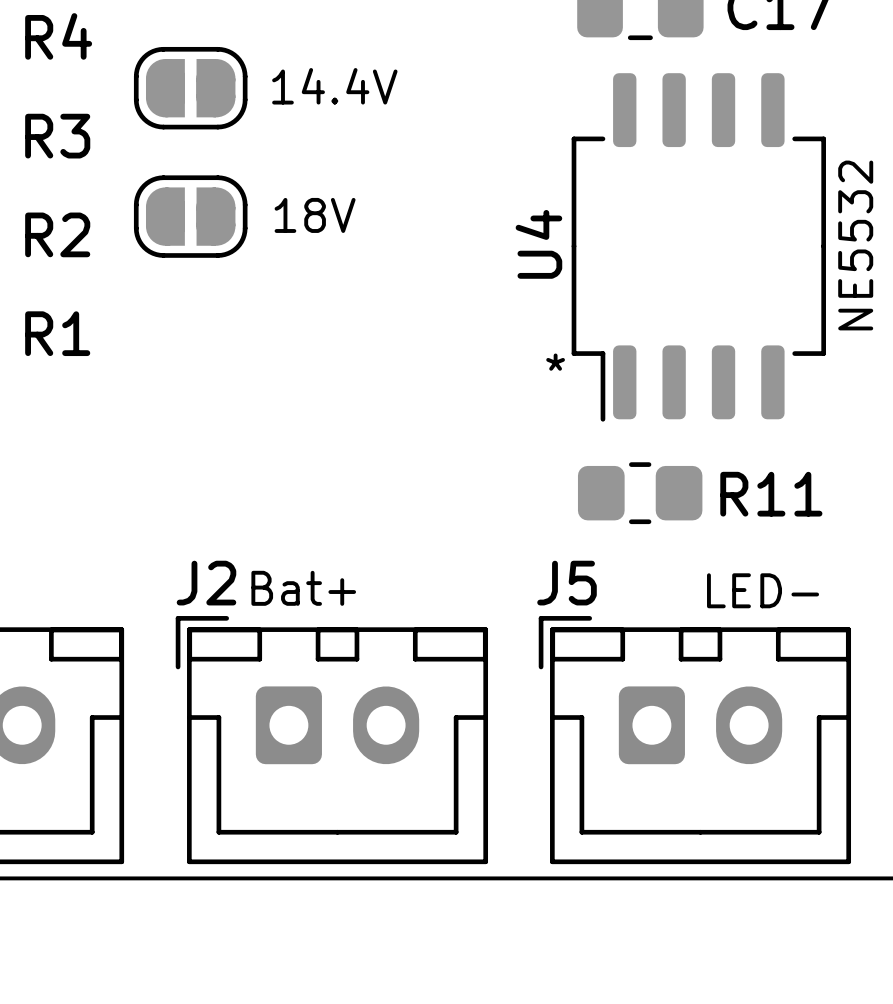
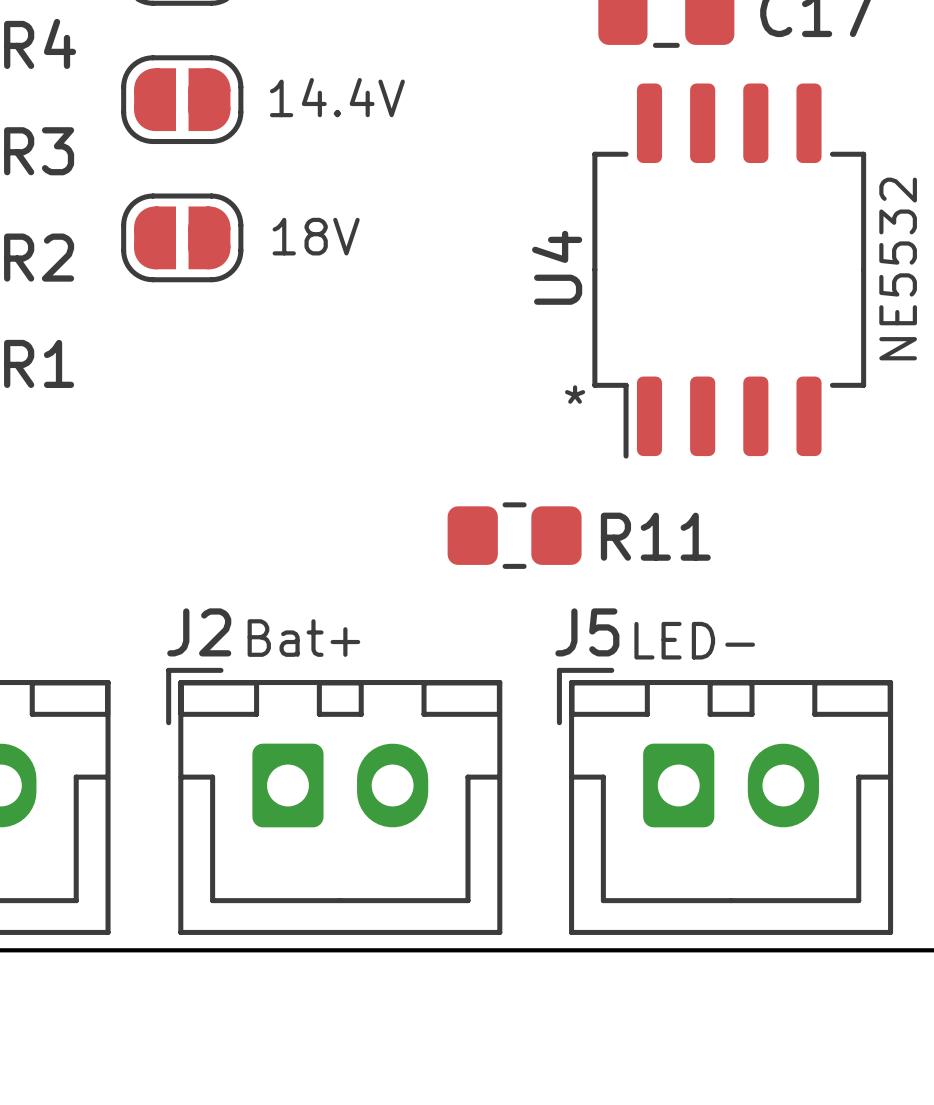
R11 position: (640, 493) -> (514, 535)
text position: LED- (763, 590) -> LED- (694, 640)

